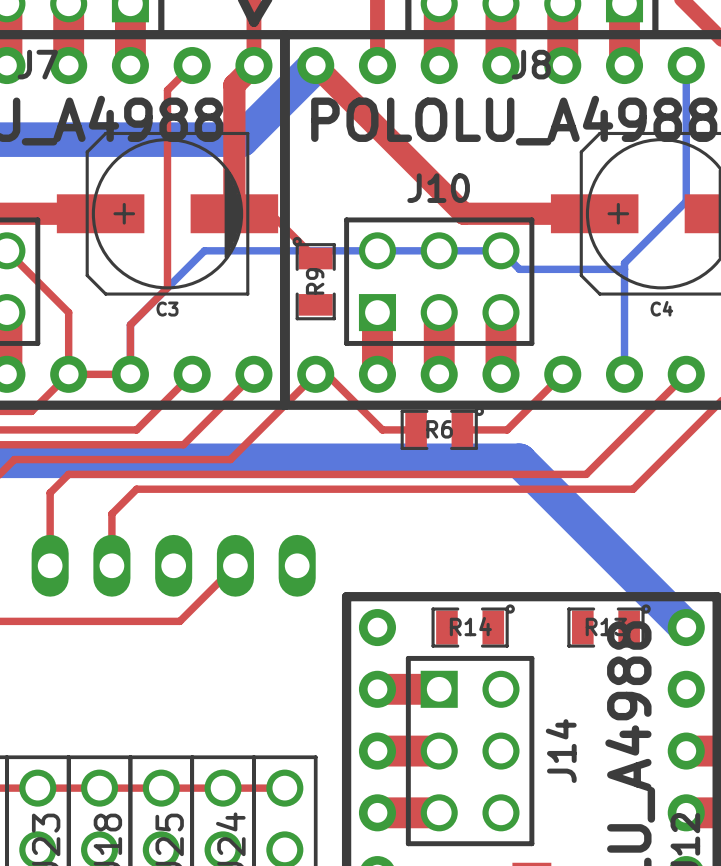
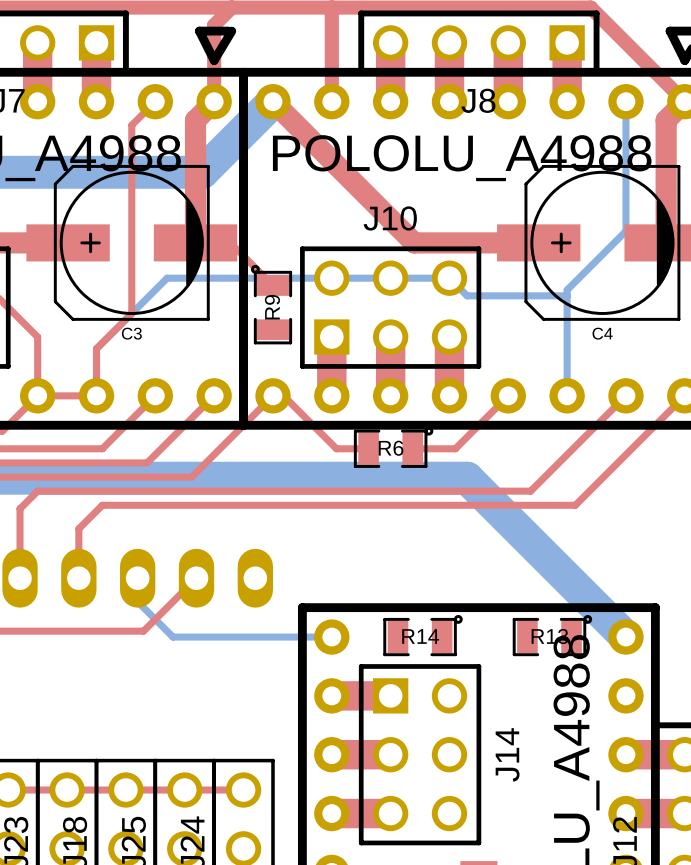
bottom track: none -> (137, 578) (137, 601) (172, 637) (331, 637)

